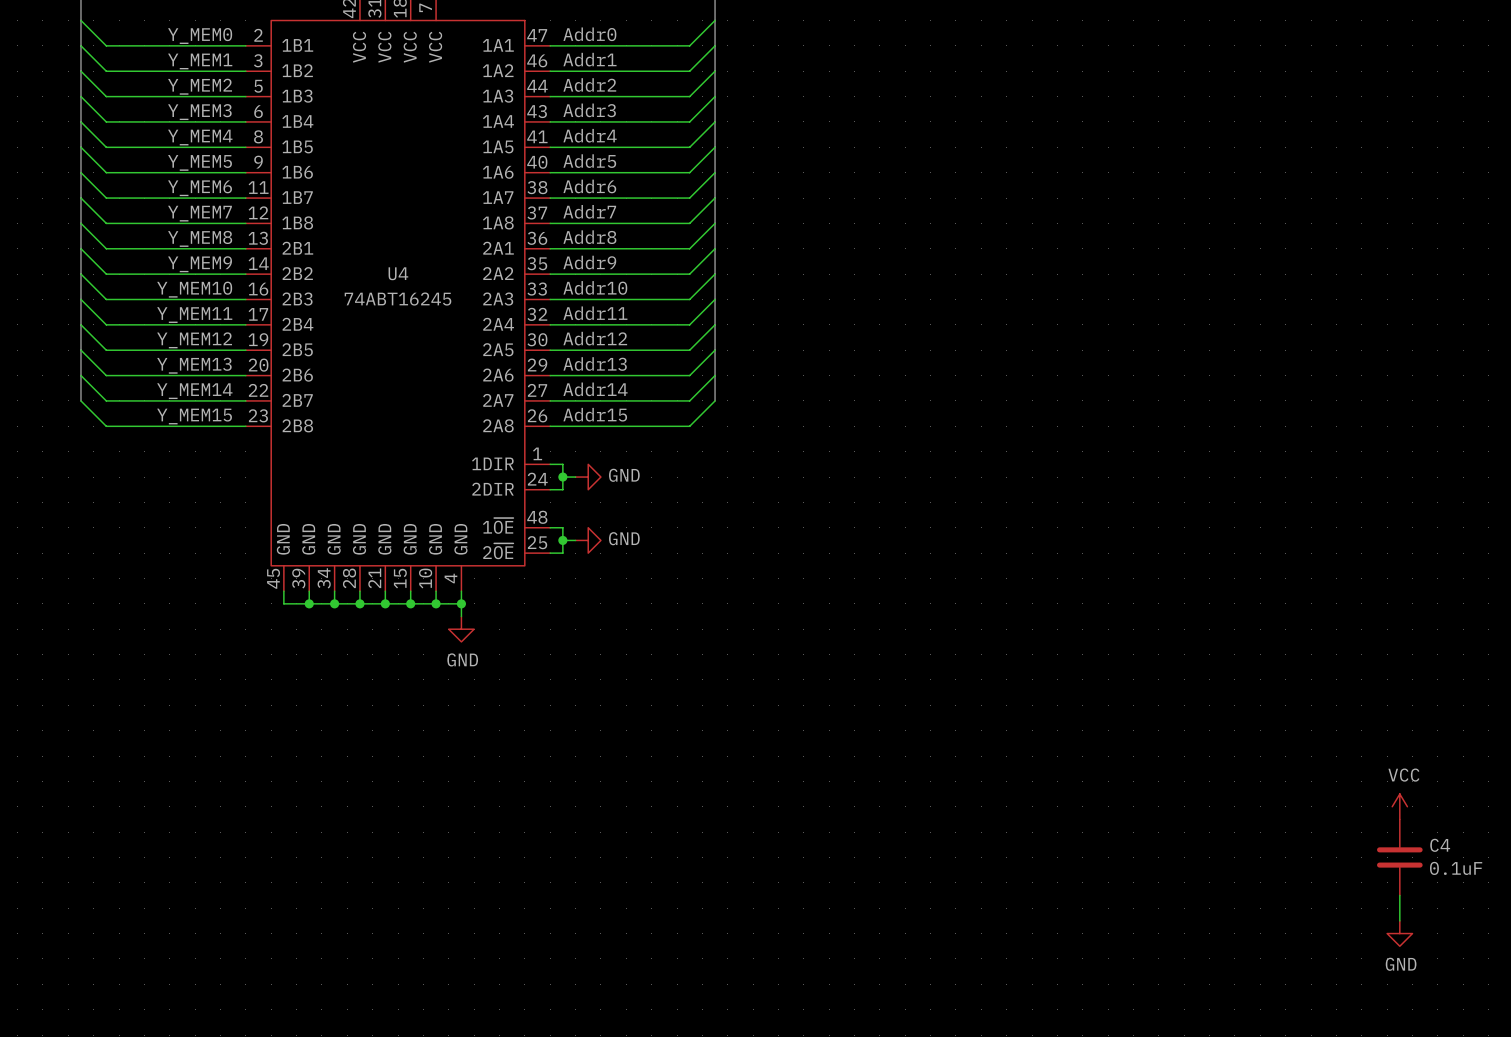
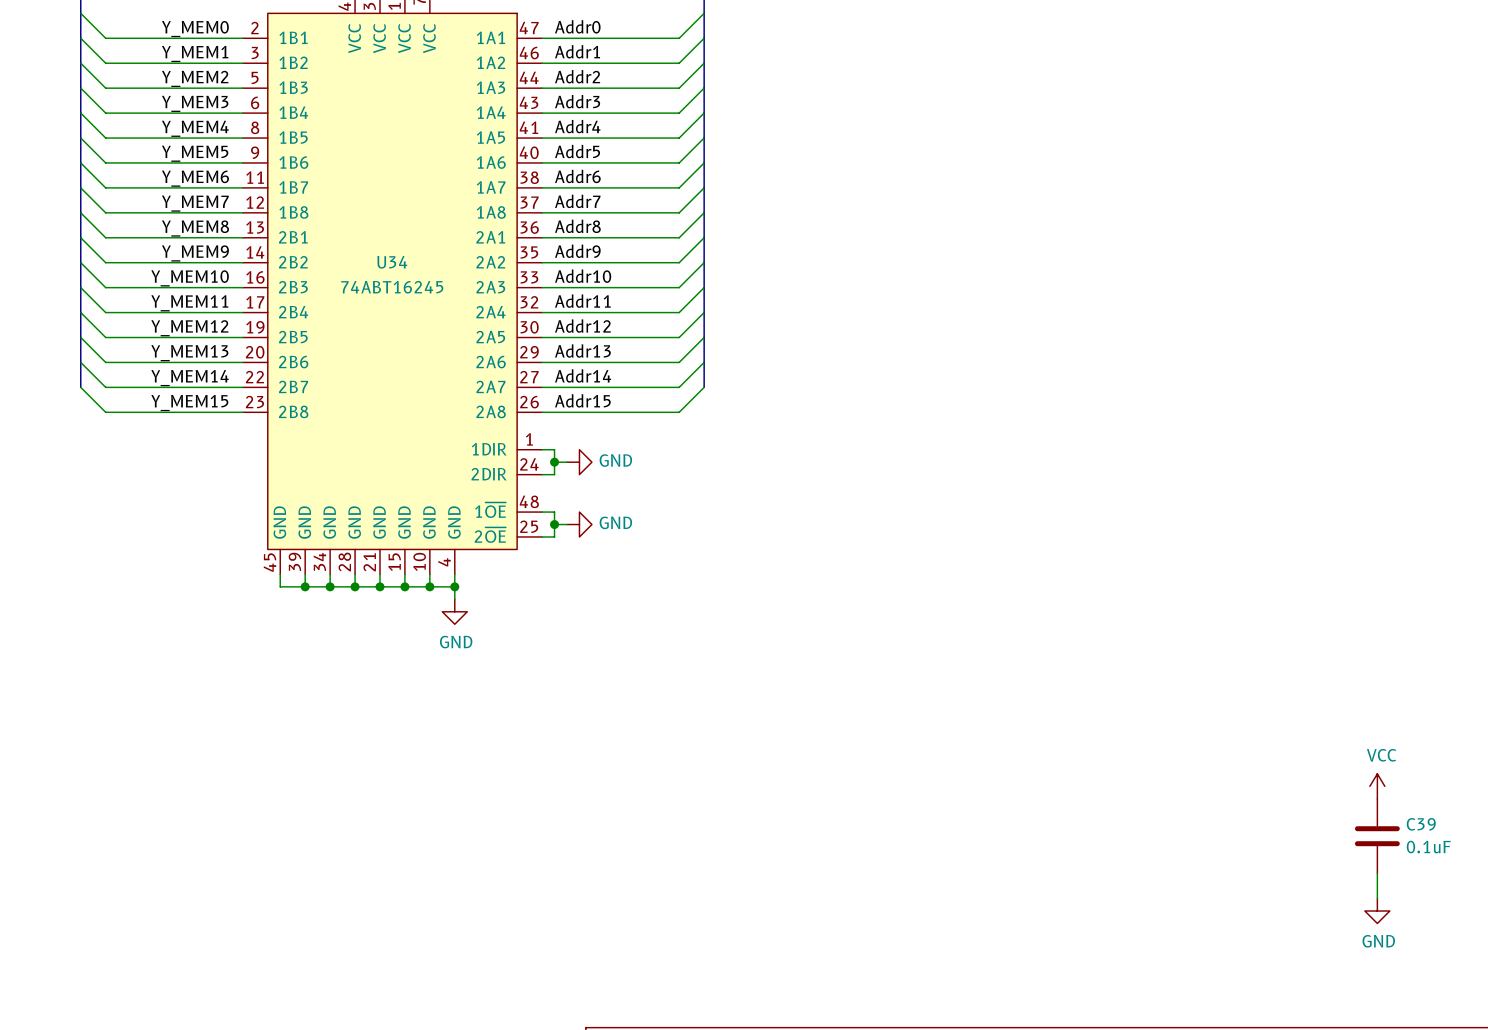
U4 name: U4 (398, 273) -> U34 (392, 262)
C4 name: C4 (1440, 845) -> C39 (1421, 824)

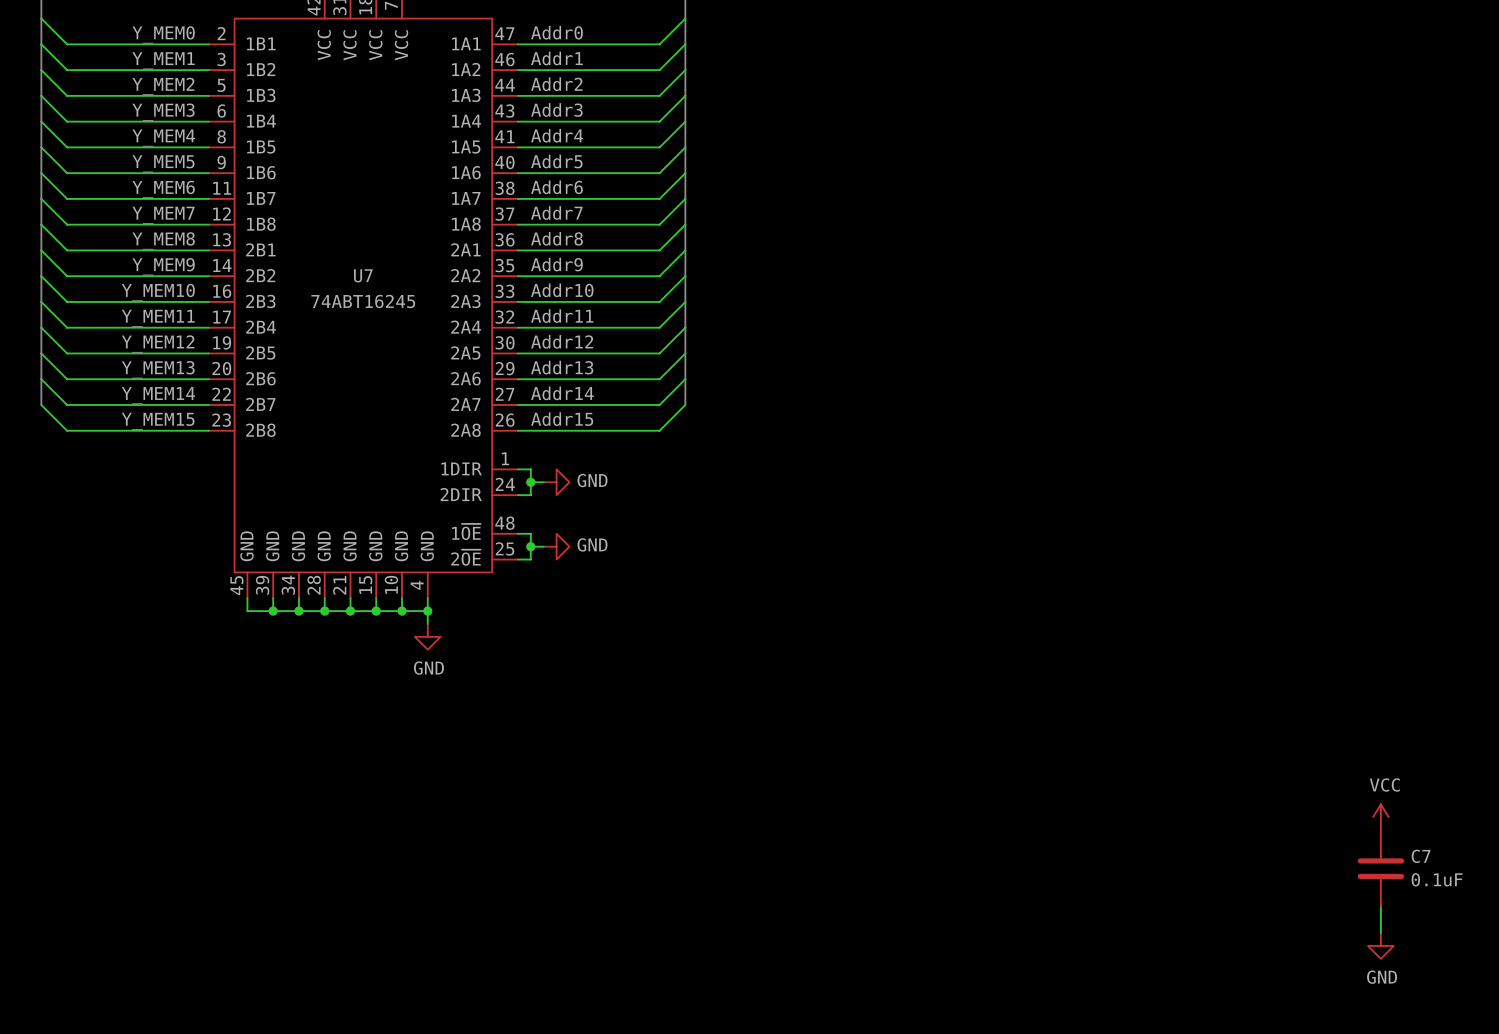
U34 name: U34 (392, 262) -> U7 (363, 275)
C39 name: C39 (1421, 824) -> C7 (1421, 856)

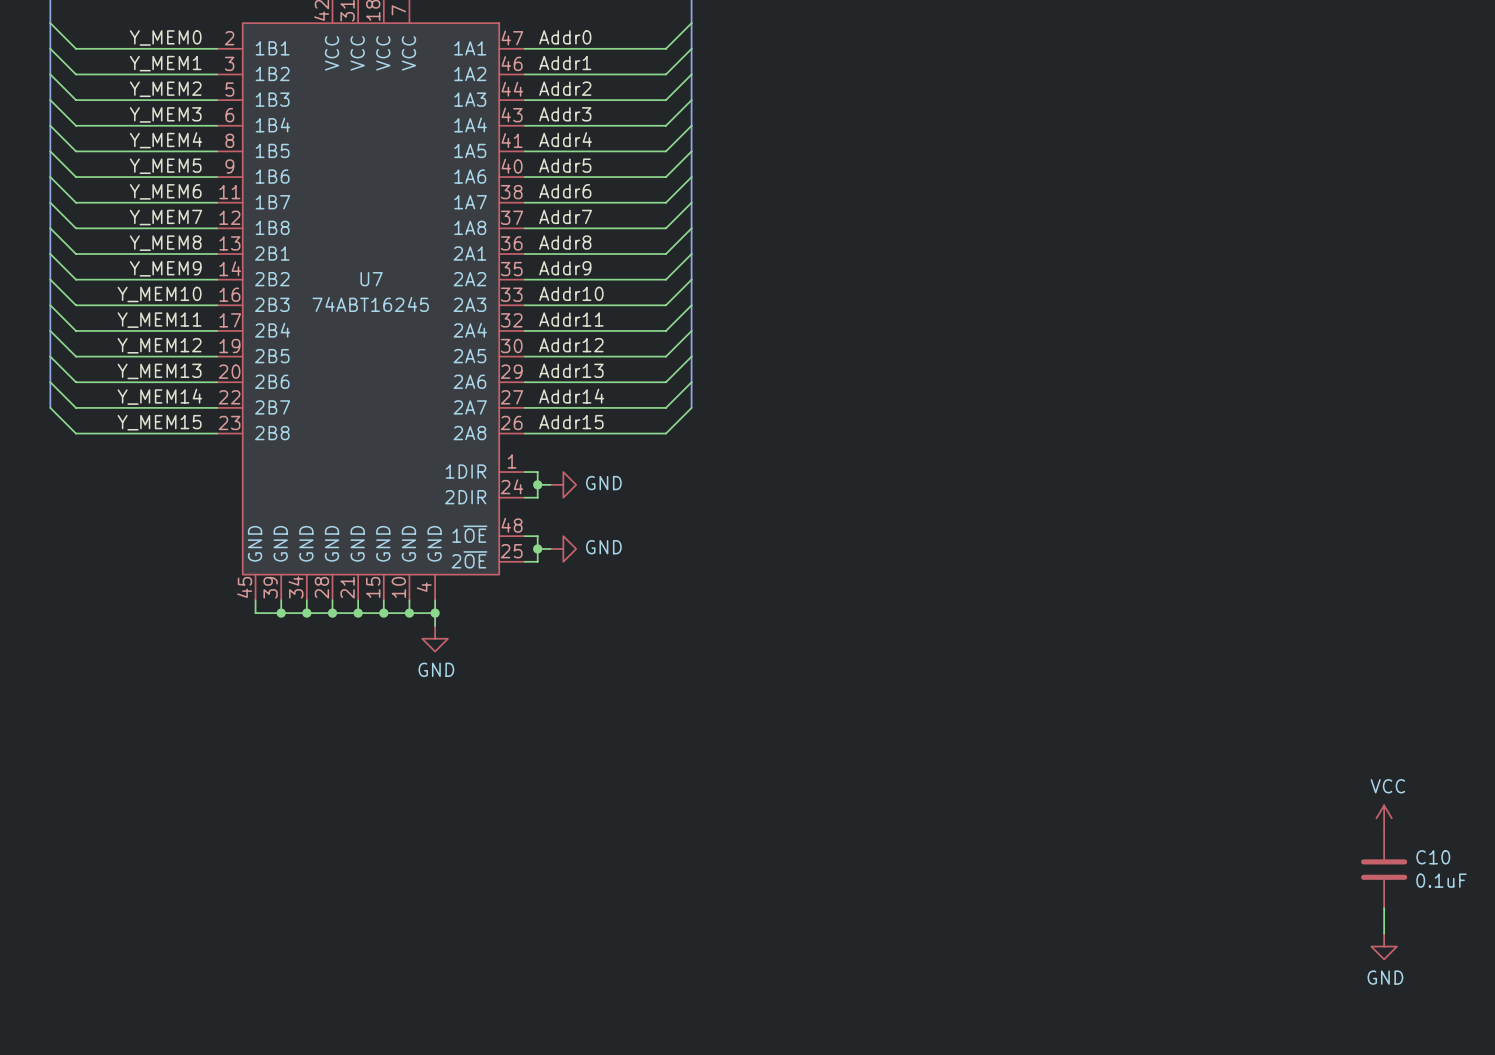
C7 name: C7 (1421, 856) -> C10 (1433, 857)

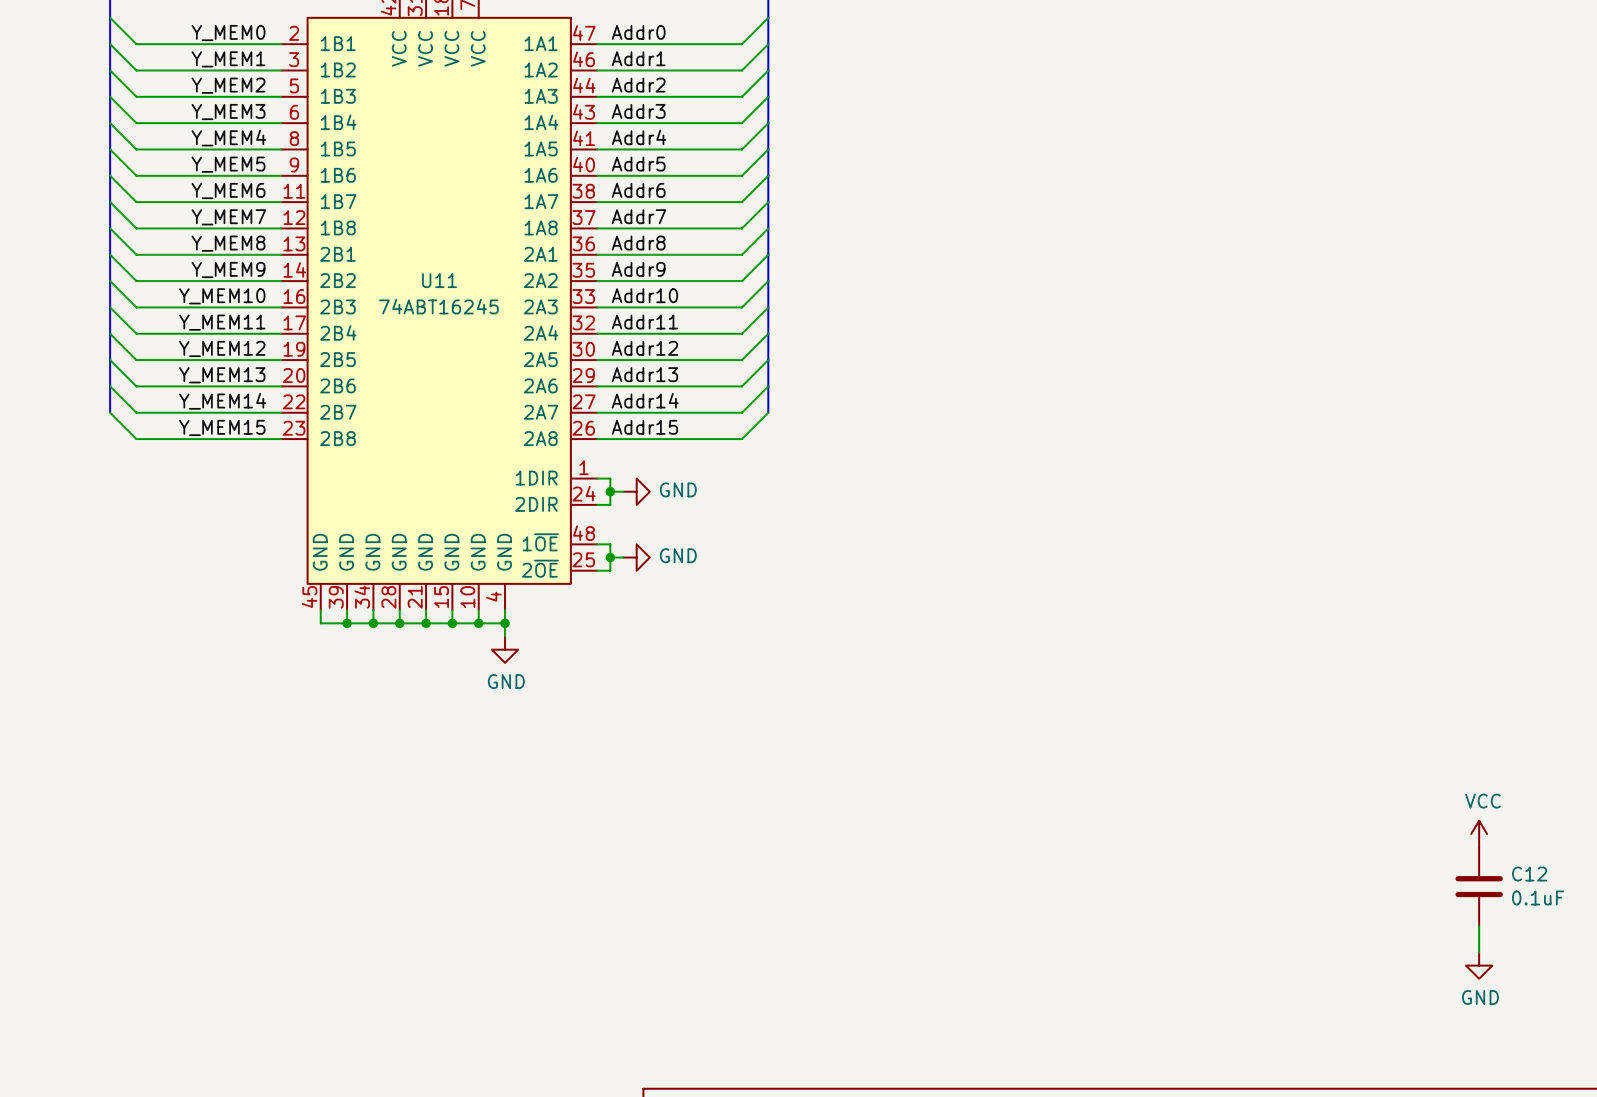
U7 name: U7 (371, 279) -> U11 (439, 280)
C10 name: C10 (1433, 857) -> C12 (1529, 874)

